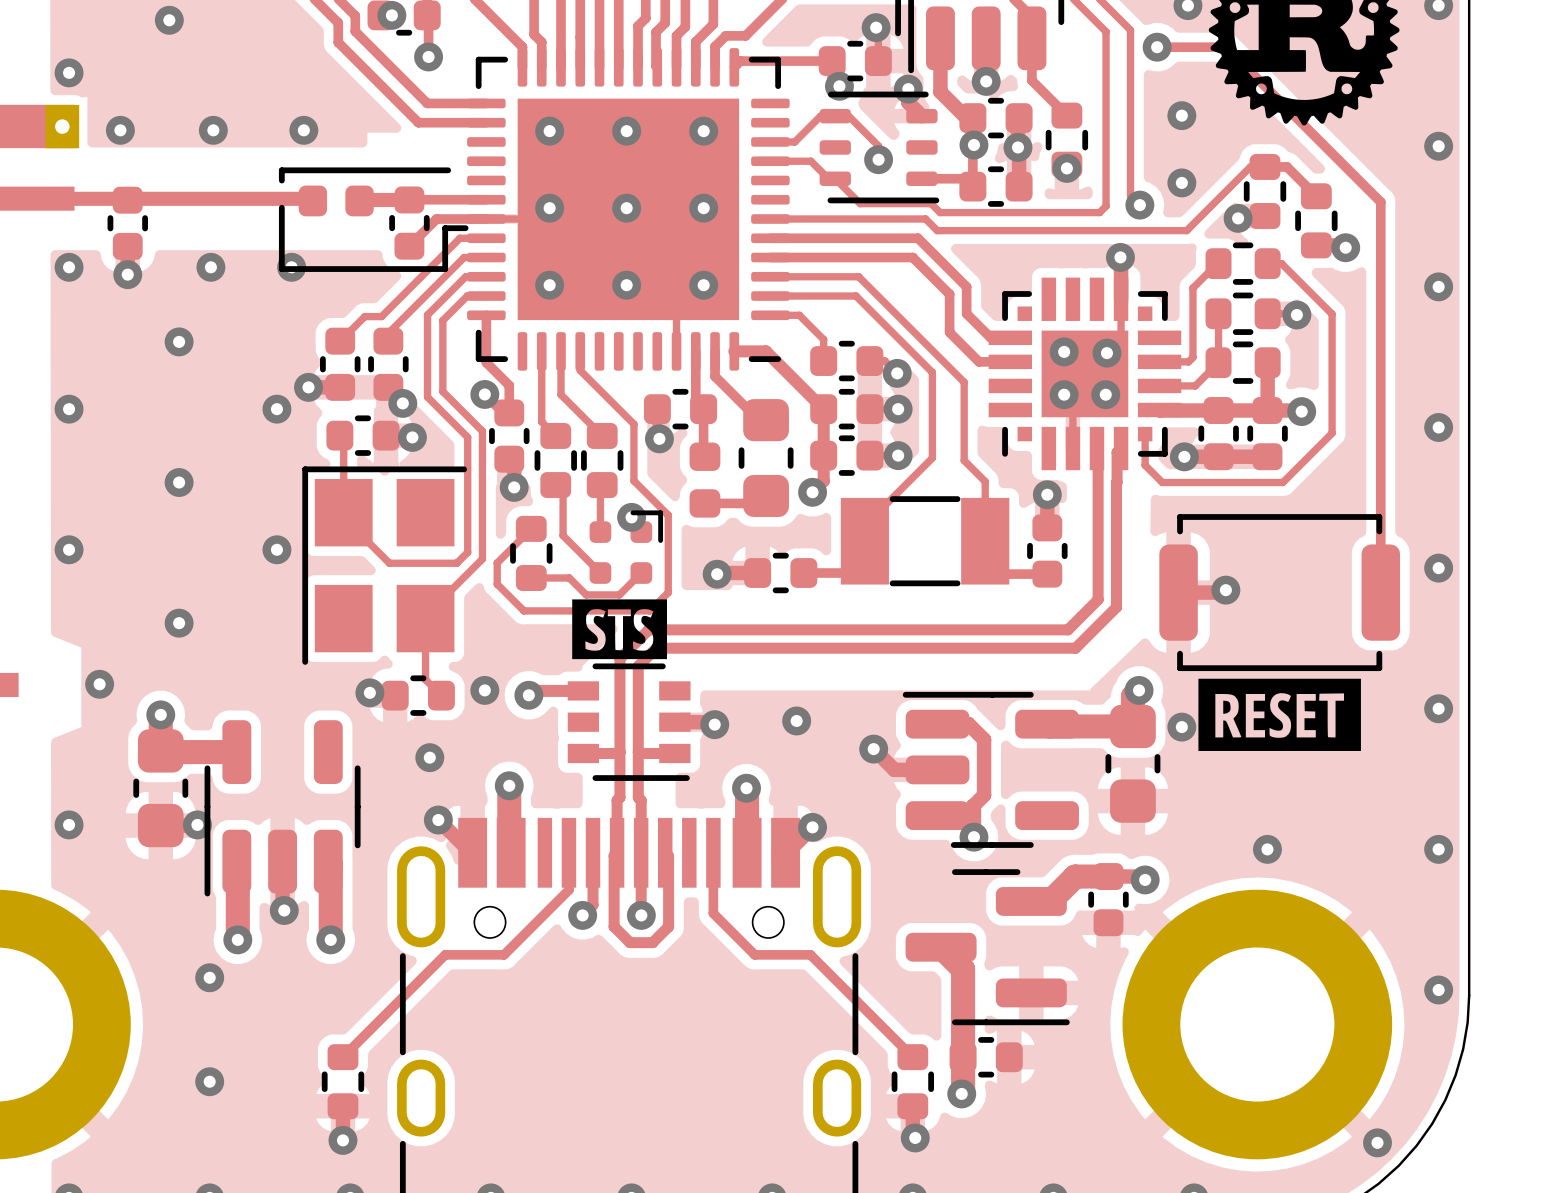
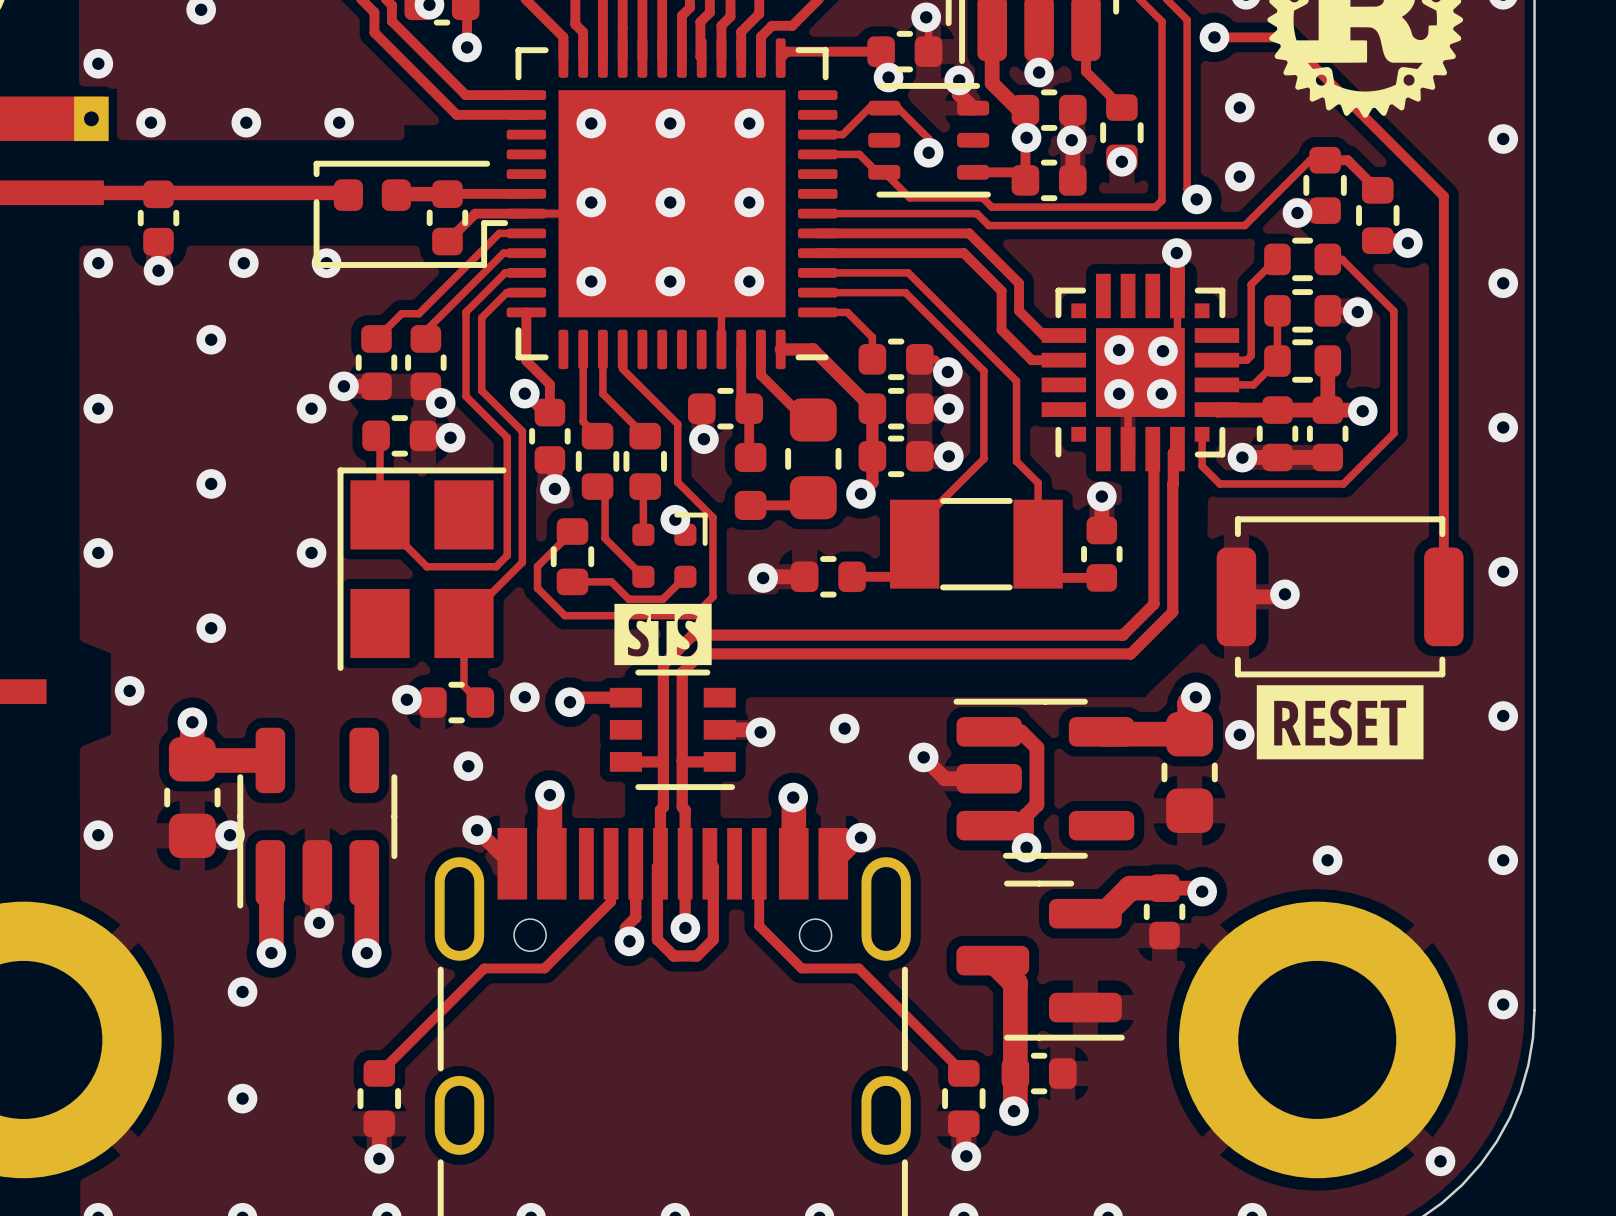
via position: (582, 915) -> (629, 941)

